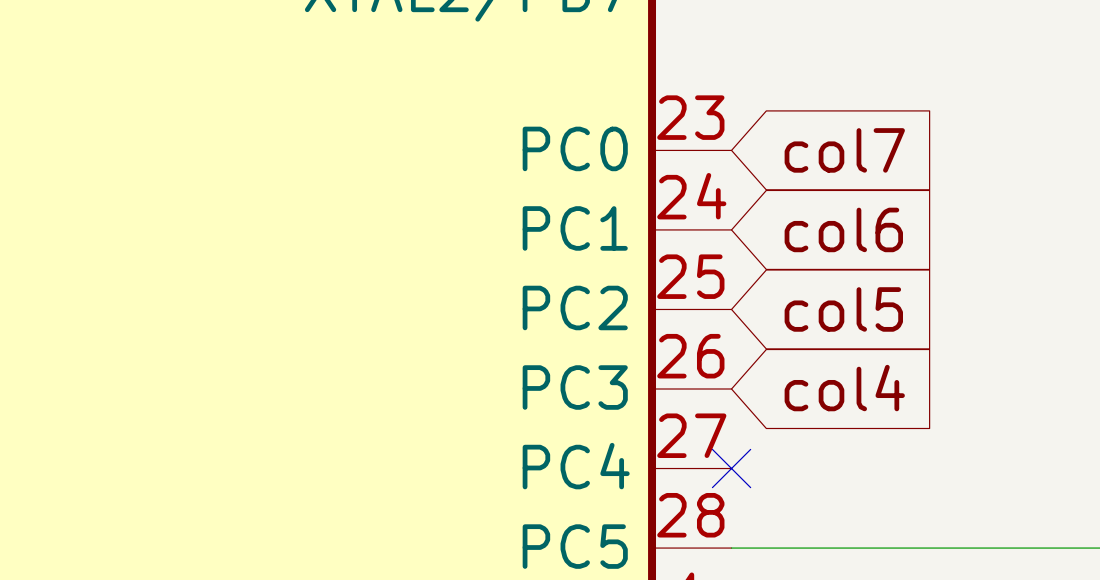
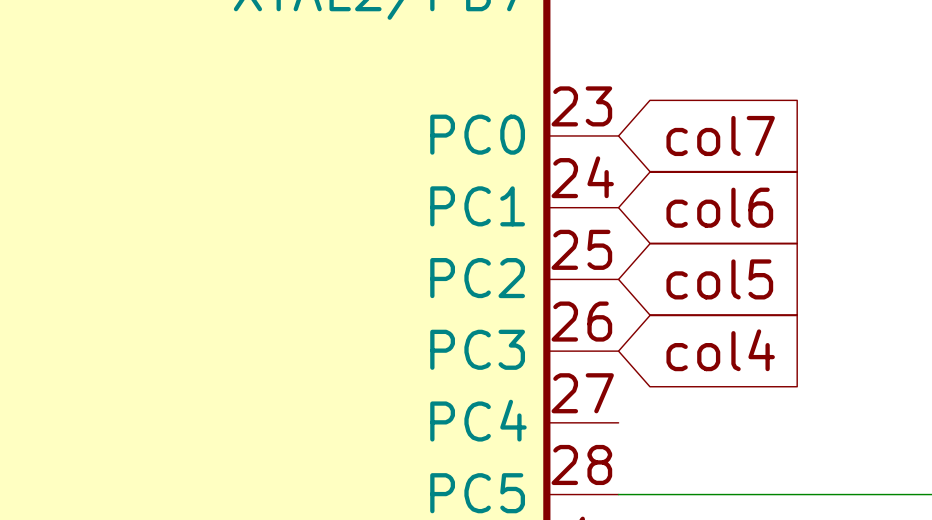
no-connect mark: (731, 468) -> none

